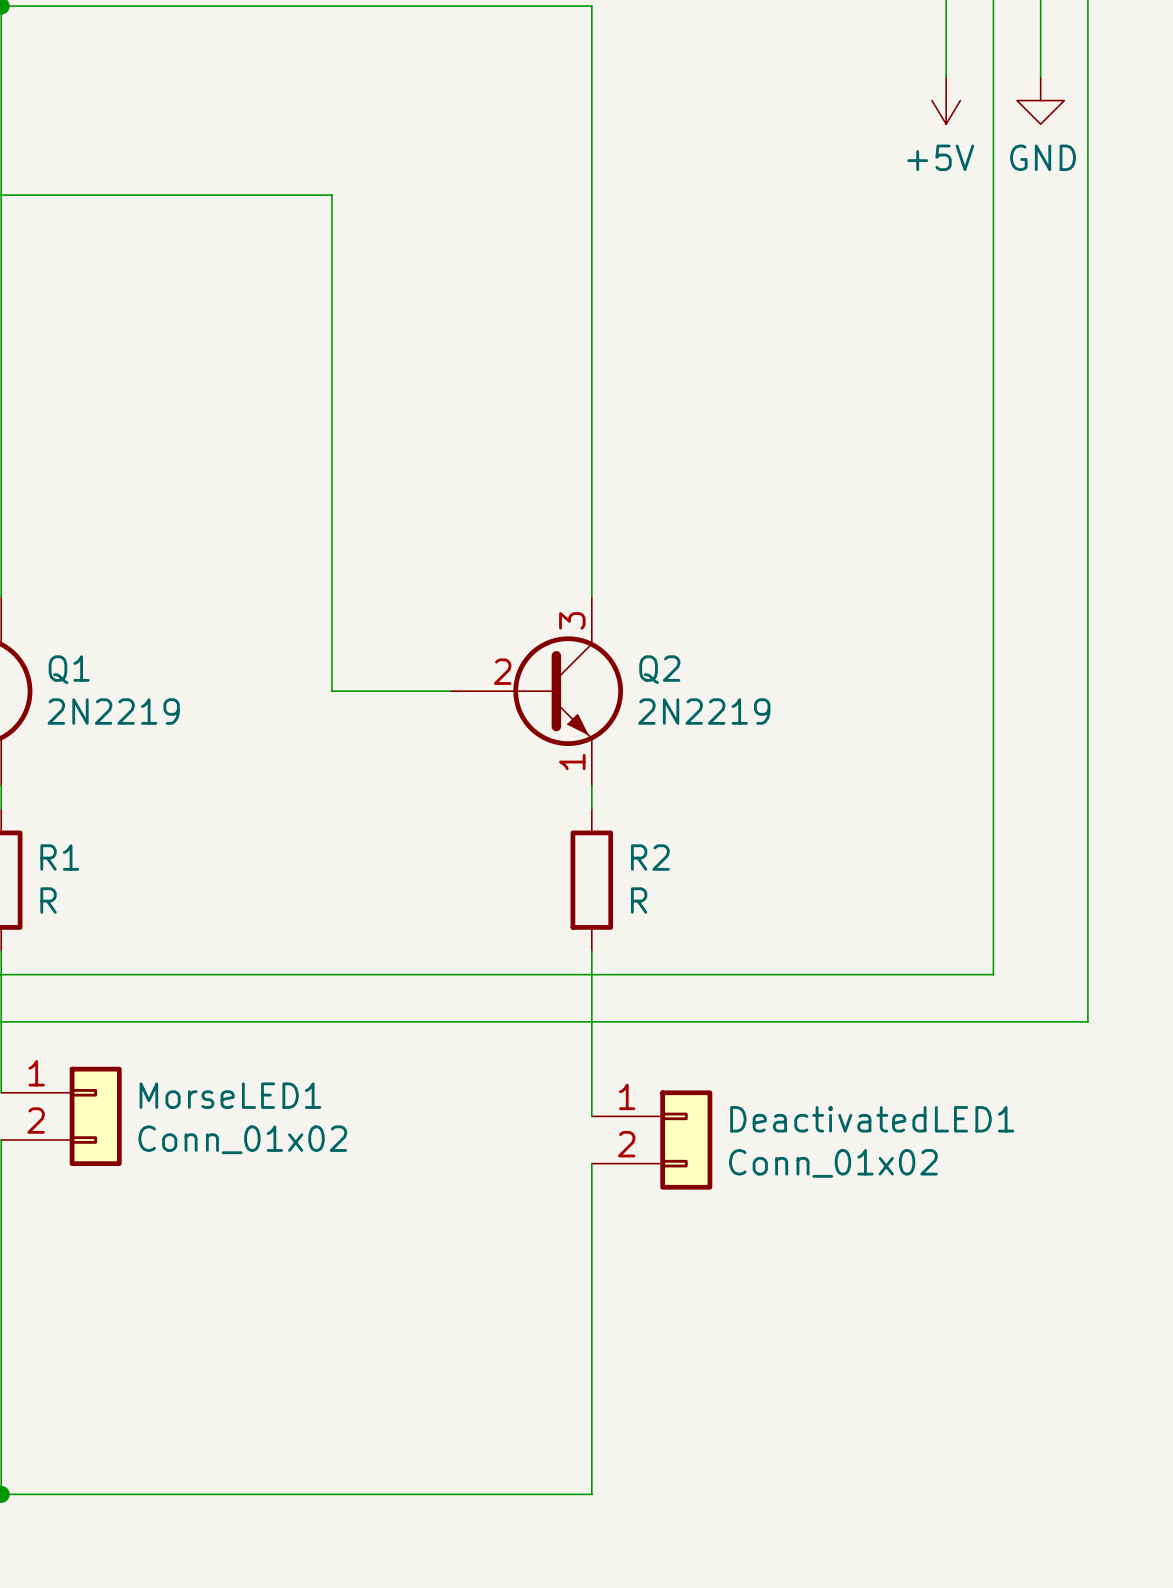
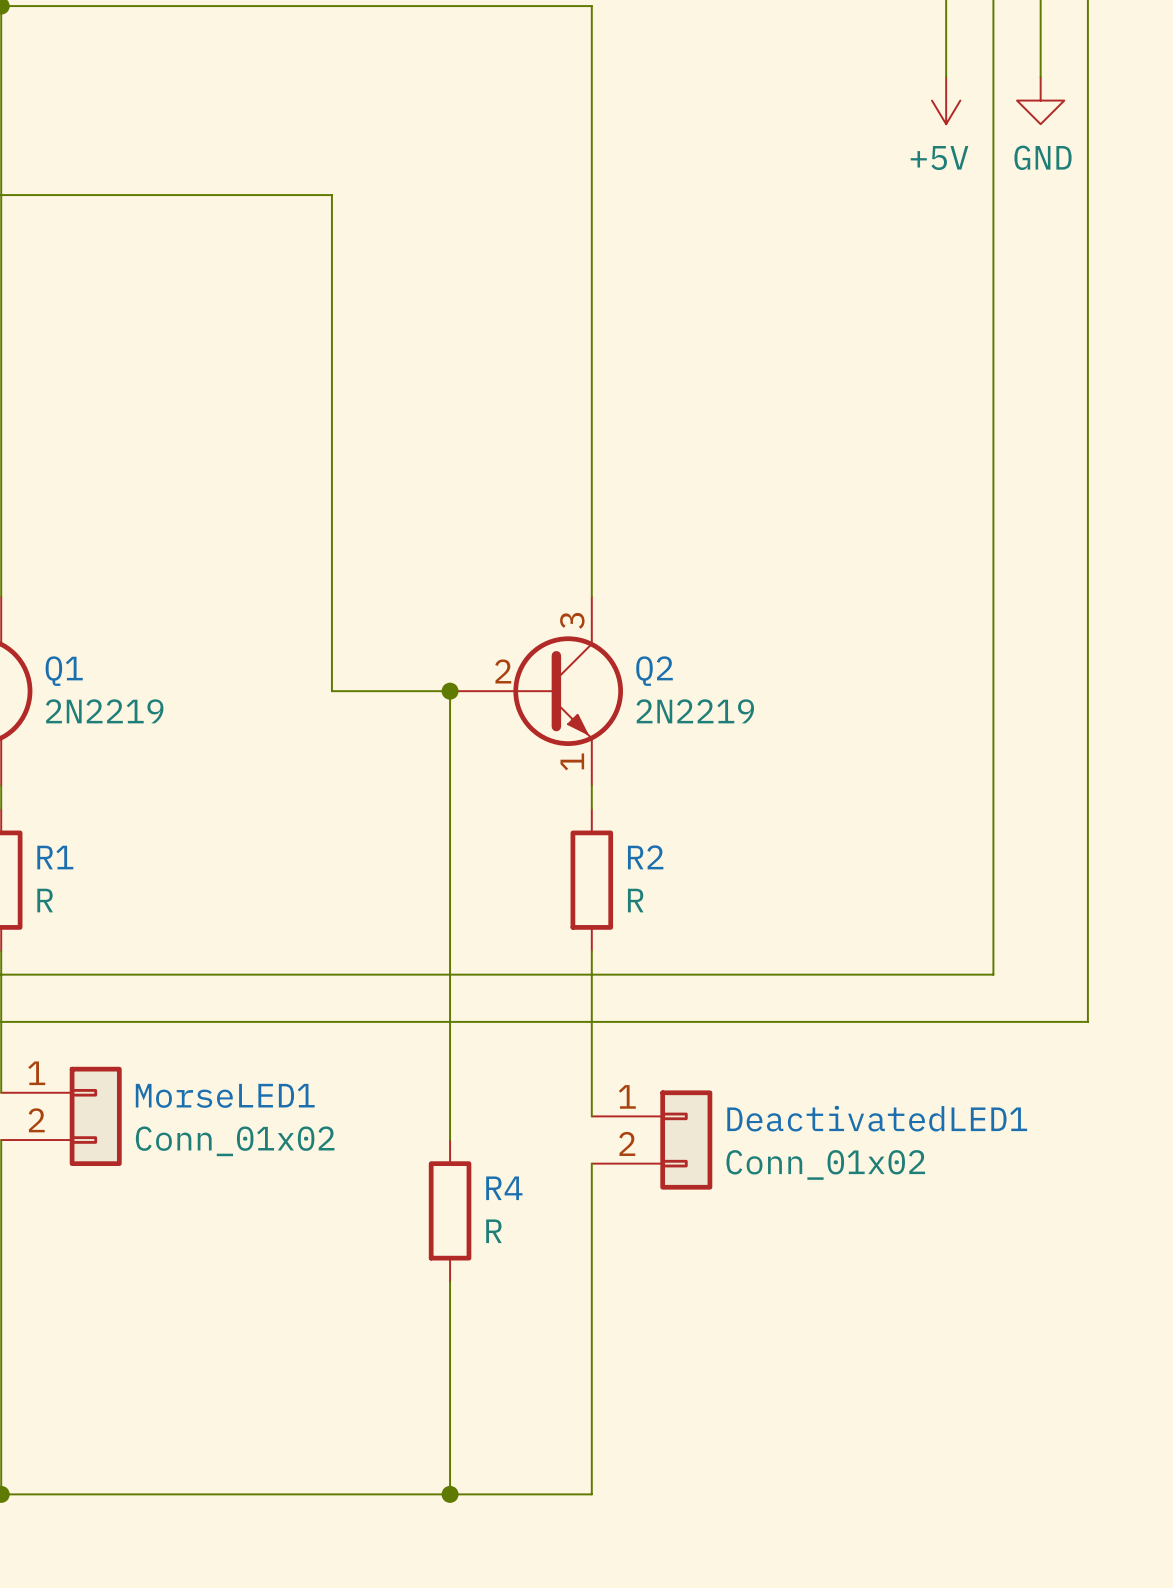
wire: none -> (450, 691) (450, 1140)
junction: none -> (450, 691)
R4: none -> R (450, 1210)
wire: none -> (450, 1281) (450, 1494)
junction: none -> (450, 1494)

